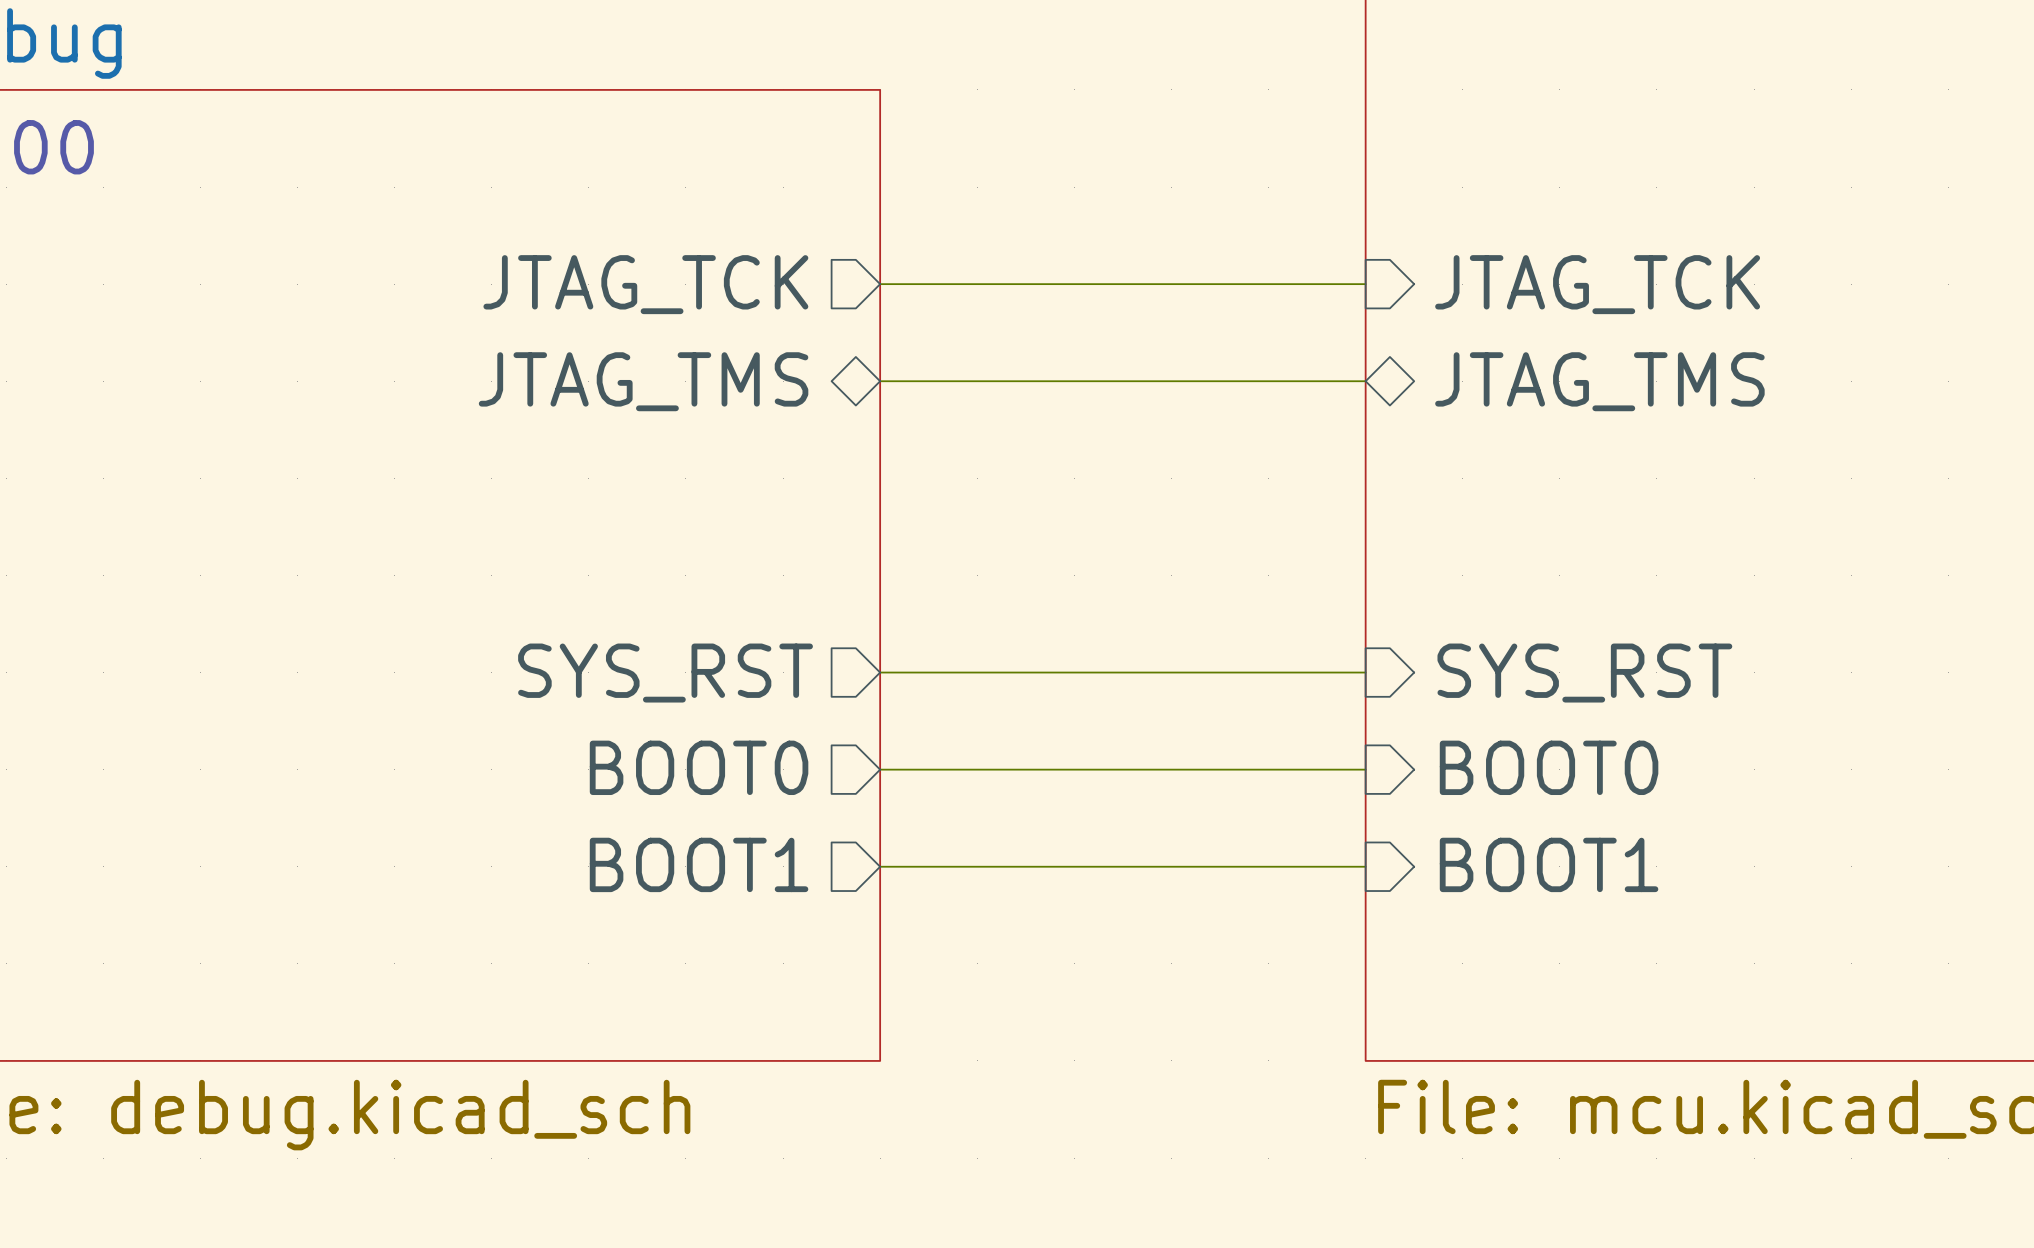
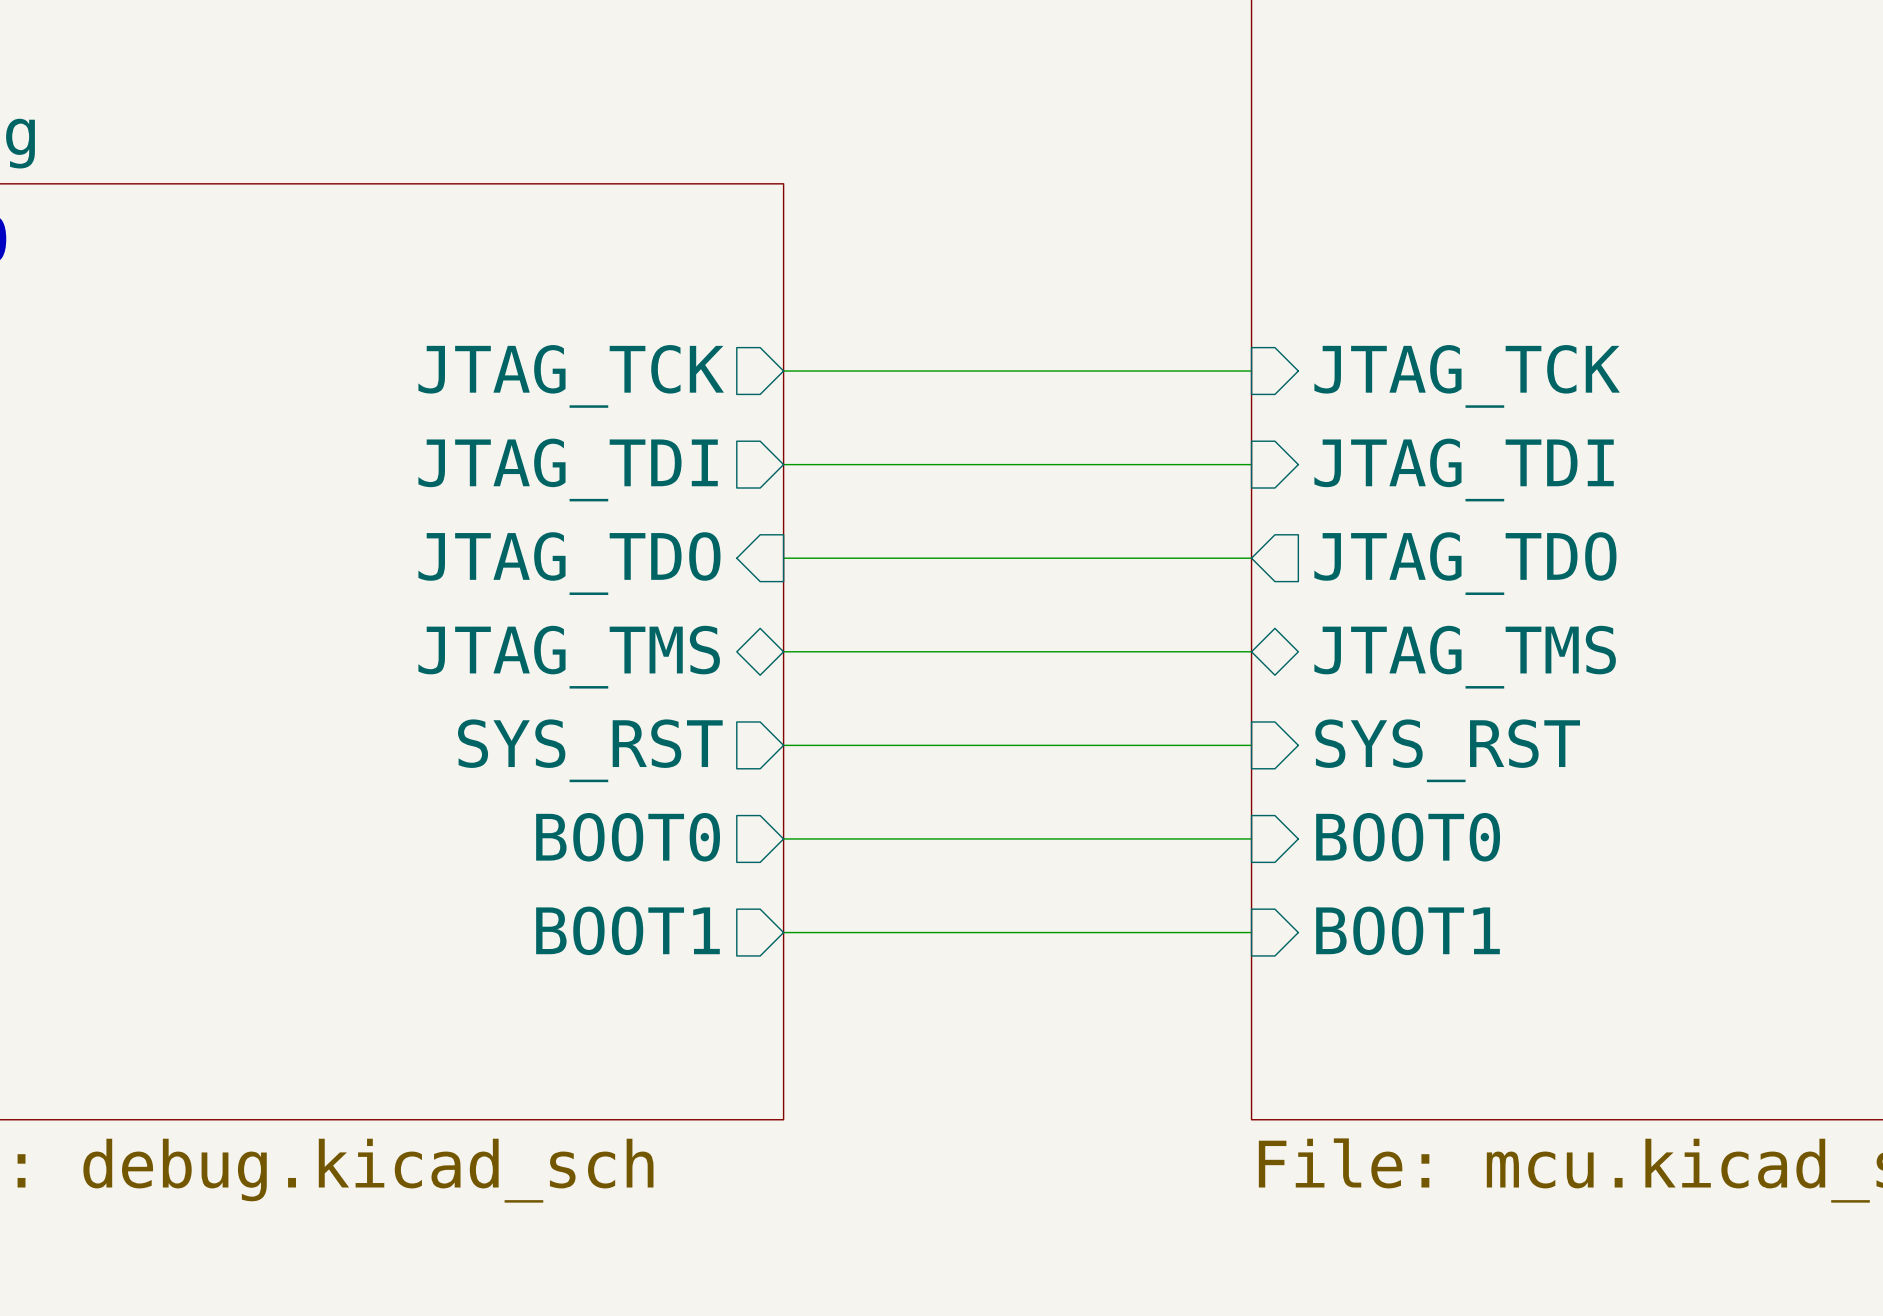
sheet pin shape: bidirectional (643, 381) -> output (568, 470)
sheet pin: JTAG_TMS (643, 381) -> JTAG_TDI (568, 470)
sheet pin shape: bidirectional (1599, 381) -> input (1464, 470)
sheet pin: JTAG_TMS (1599, 381) -> JTAG_TDI (1464, 470)
sheet pin: none -> JTAG_TDO (569, 563)
wire: none -> (783, 558) (1251, 558)
sheet pin: none -> JTAG_TDO (1465, 563)
sheet pin: none -> JTAG_TMS (569, 657)
wire: none -> (783, 651) (1251, 651)
sheet pin: none -> JTAG_TMS (1465, 657)

